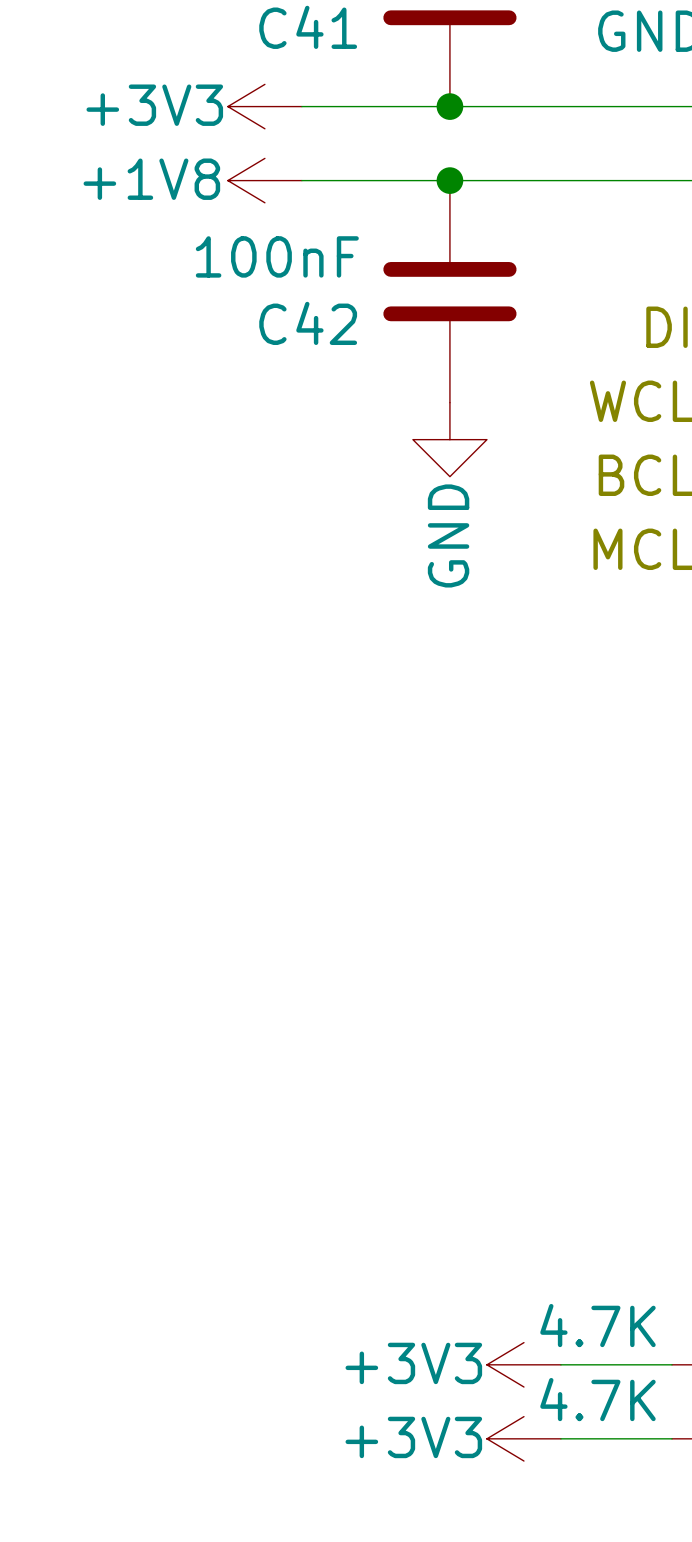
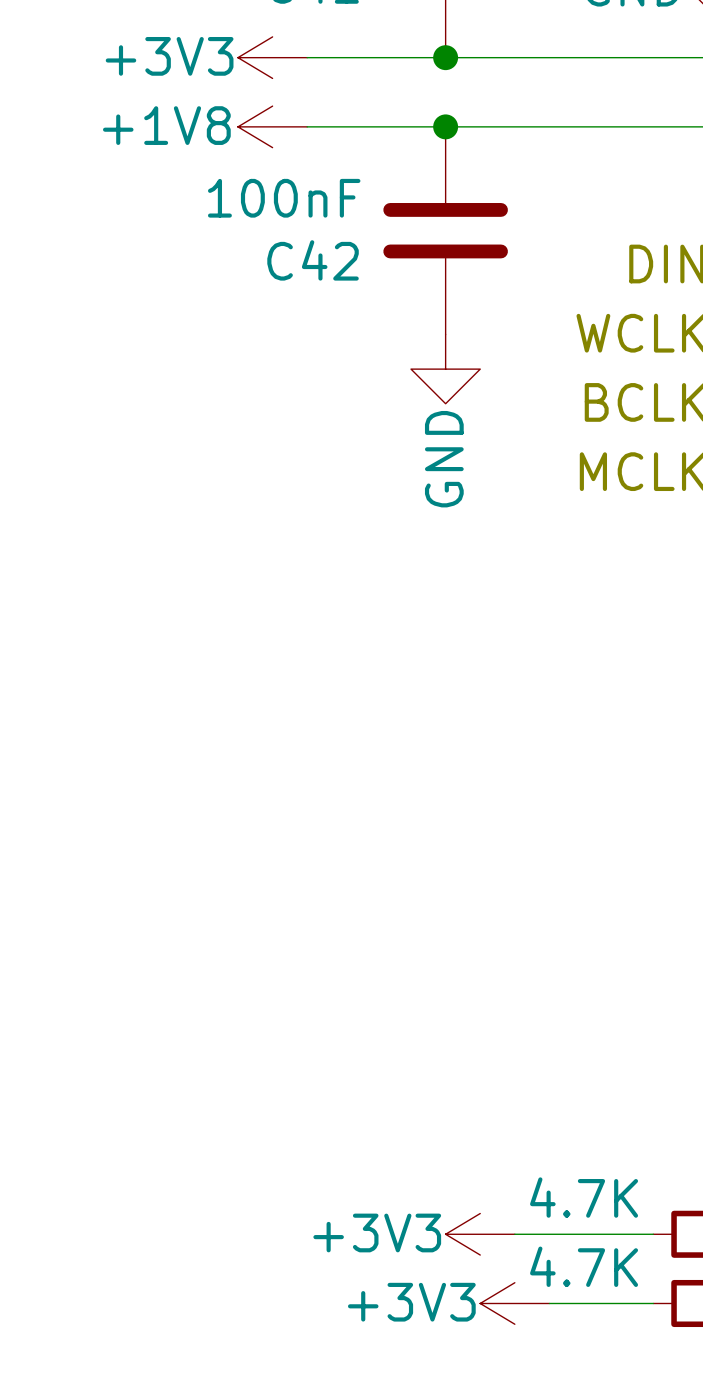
power symbol position: +3V3 (523, 1364) -> +3V3 (480, 1234)

